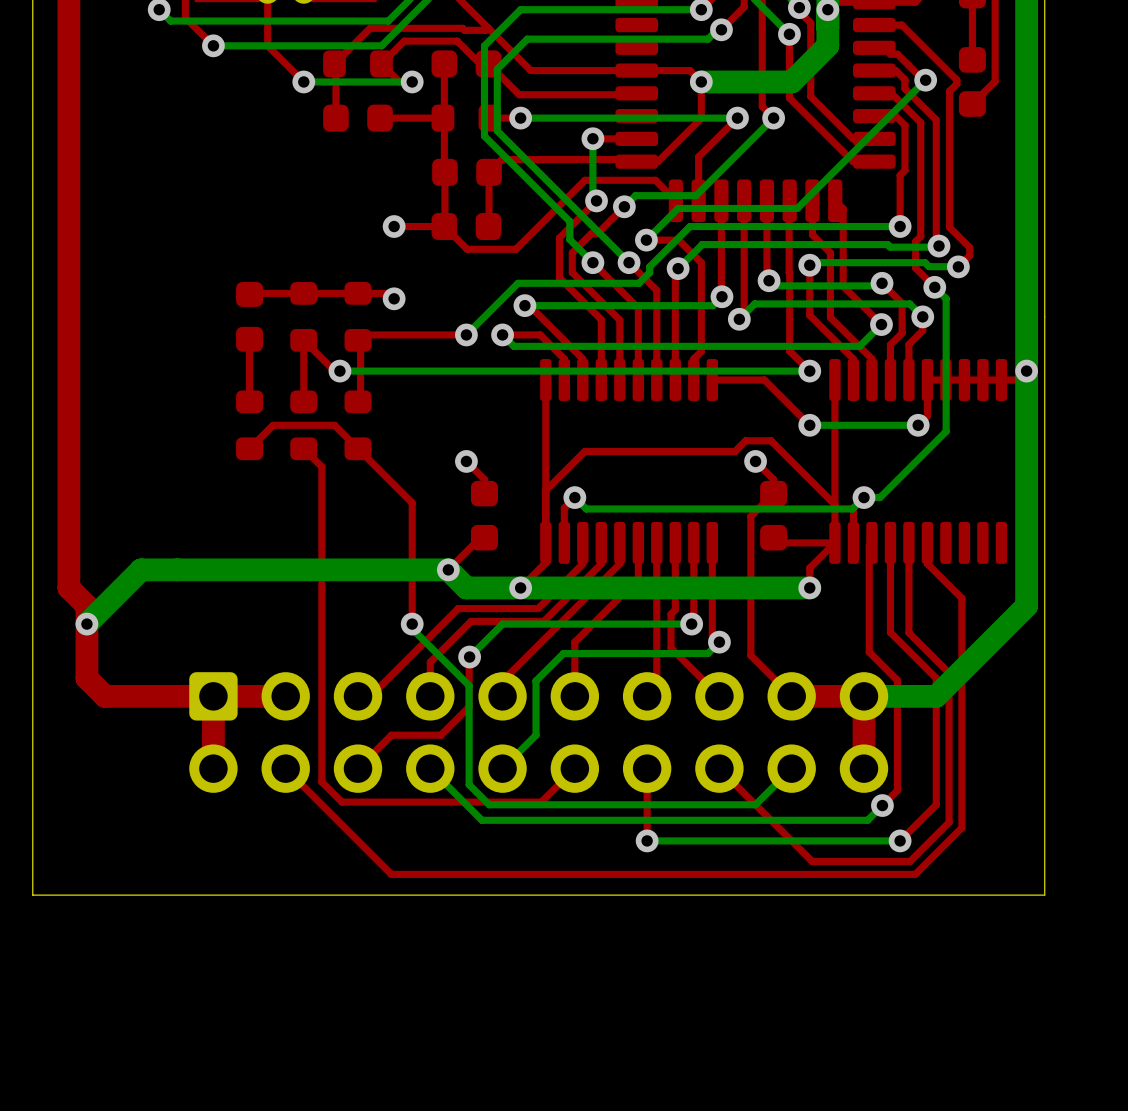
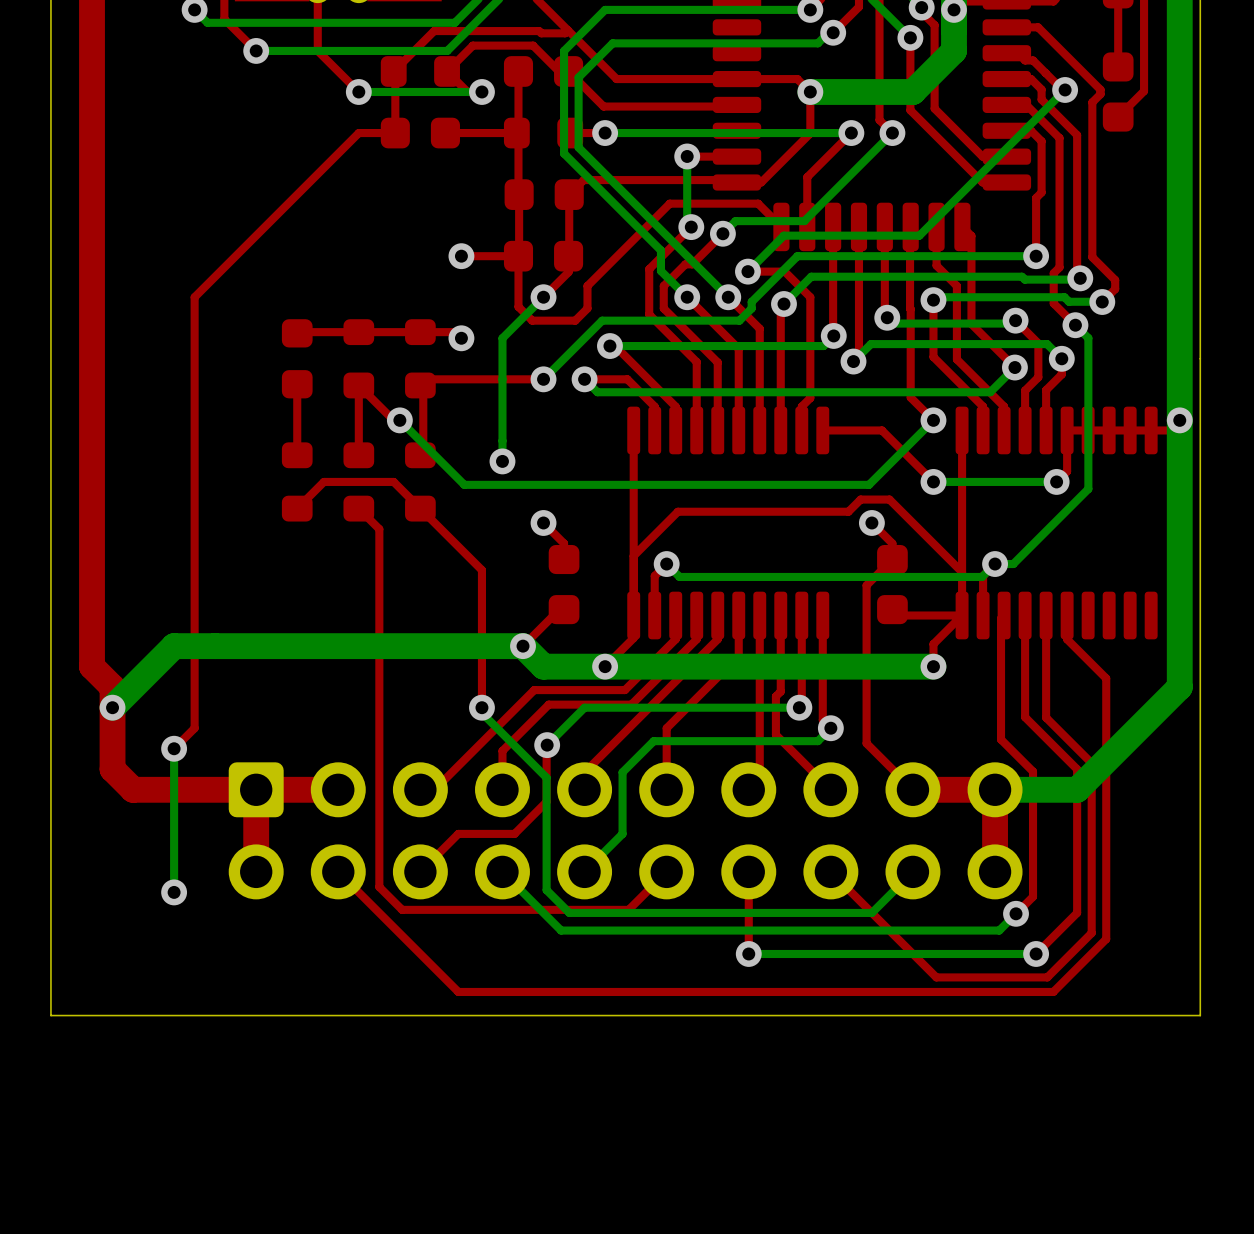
top track: none -> (395, 133) (358, 133) (194, 297) (194, 728) (174, 748)
top track: (584, 180) (515, 249) (467, 249) (444, 226) -> (678, 203) (669, 203) (587, 285) (587, 308) (575, 320) (532, 320) (518, 306) (518, 256)
top track: none -> (568, 256) (568, 272) (543, 297)
bottom track: none -> (543, 297) (502, 338) (502, 461)
via: none -> (543, 297)
bottom track: (809, 371) (339, 371) -> (933, 420) (869, 484) (464, 484) (399, 420)
via: none -> (502, 461)
bottom track: none -> (174, 748) (174, 892)
via: none -> (174, 748)
via: none -> (174, 892)

